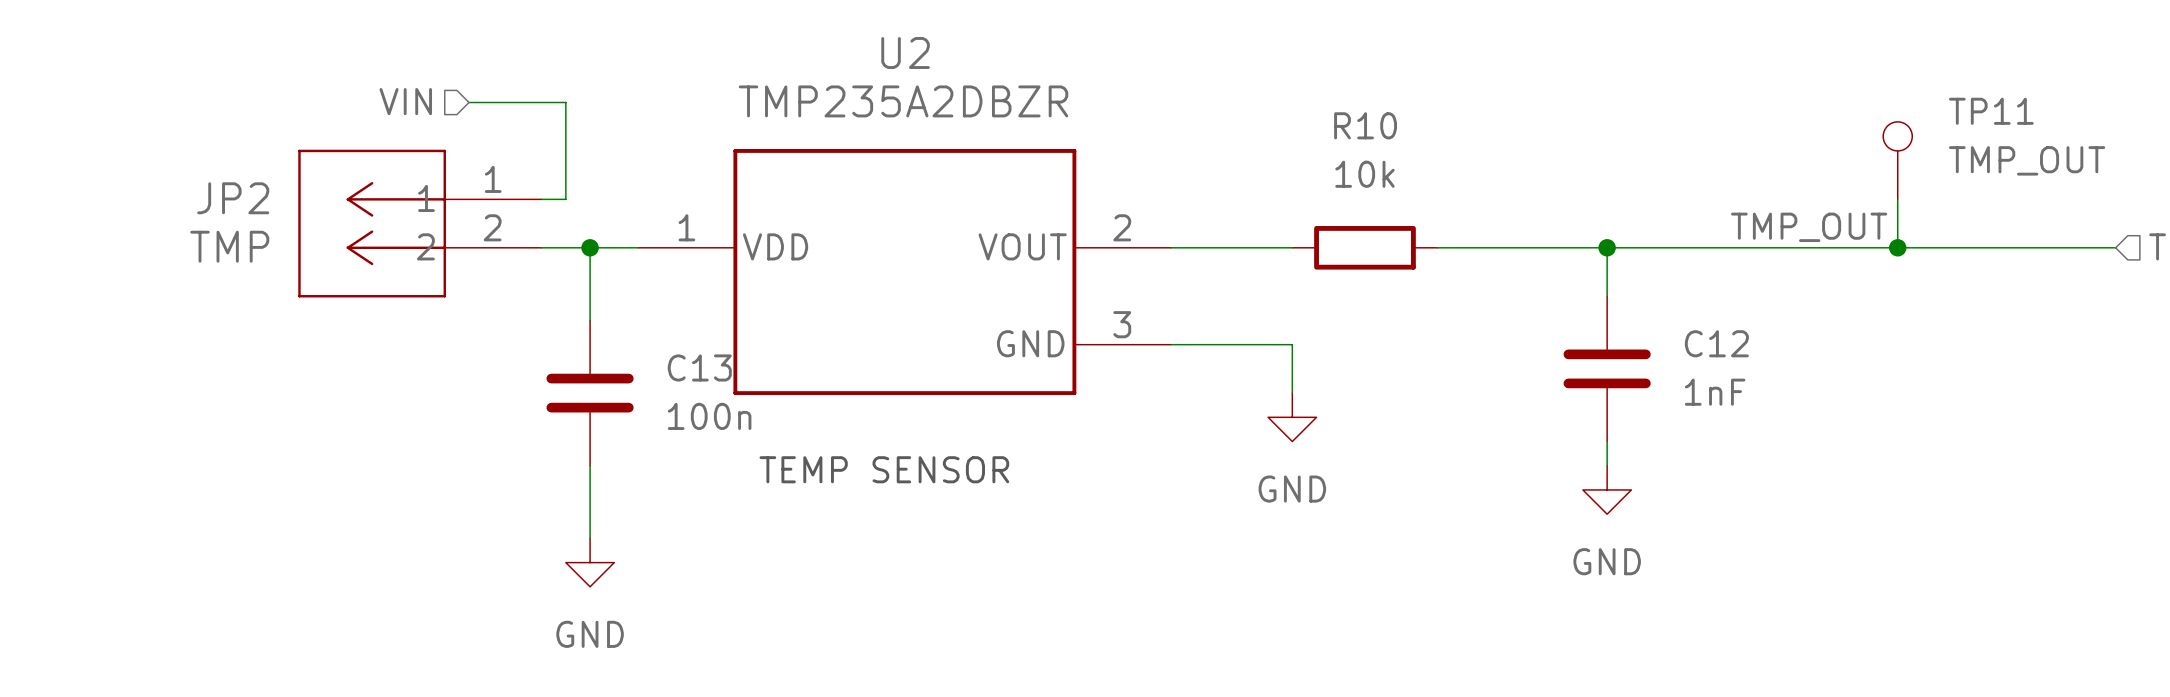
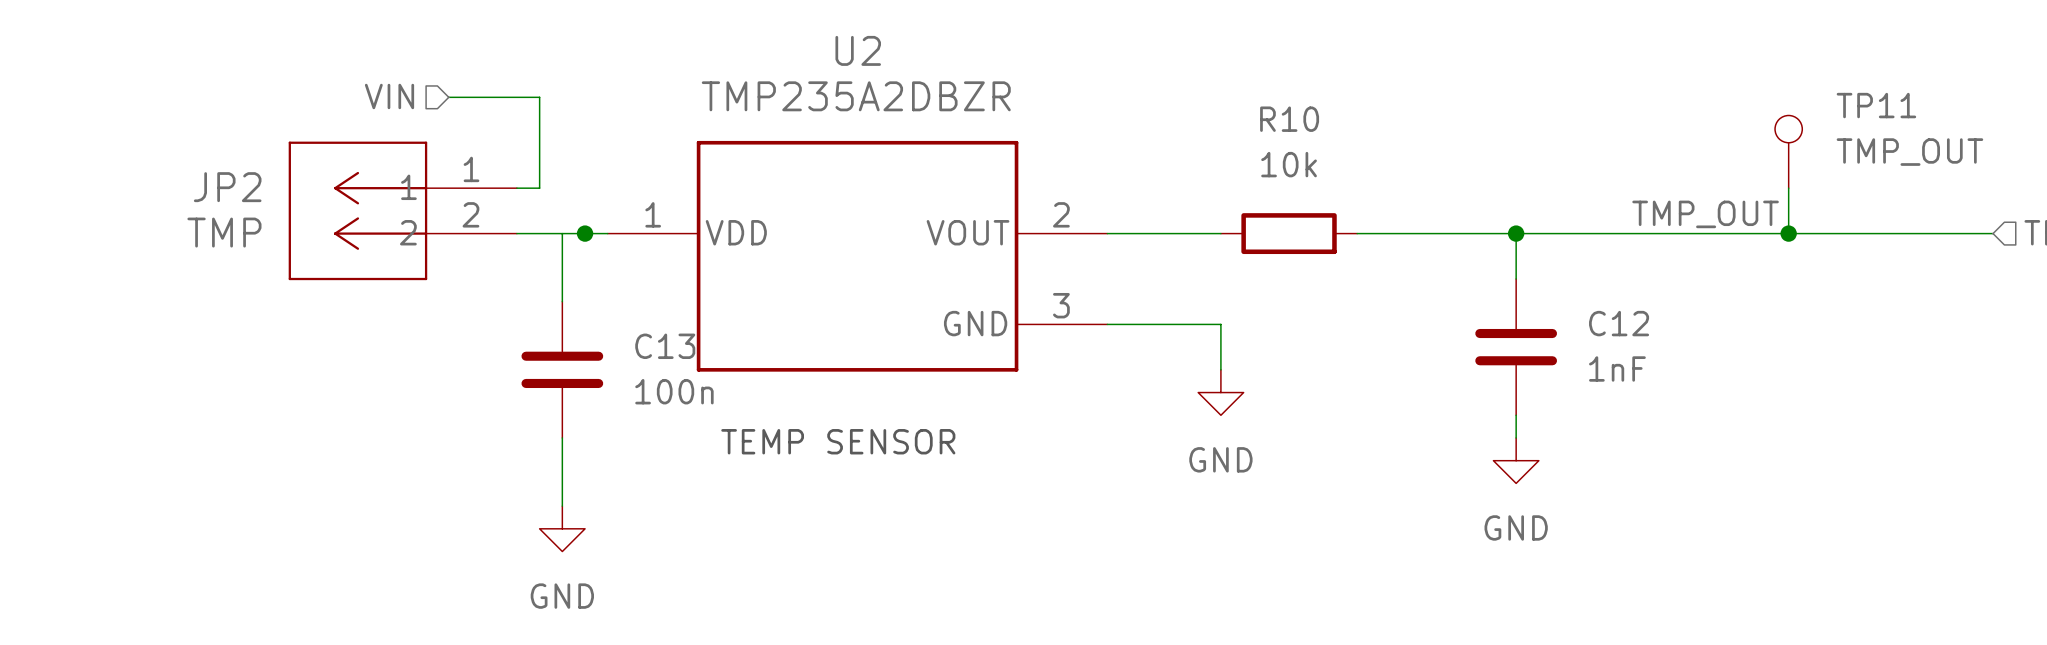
junction position: (590, 247) -> (585, 233)

